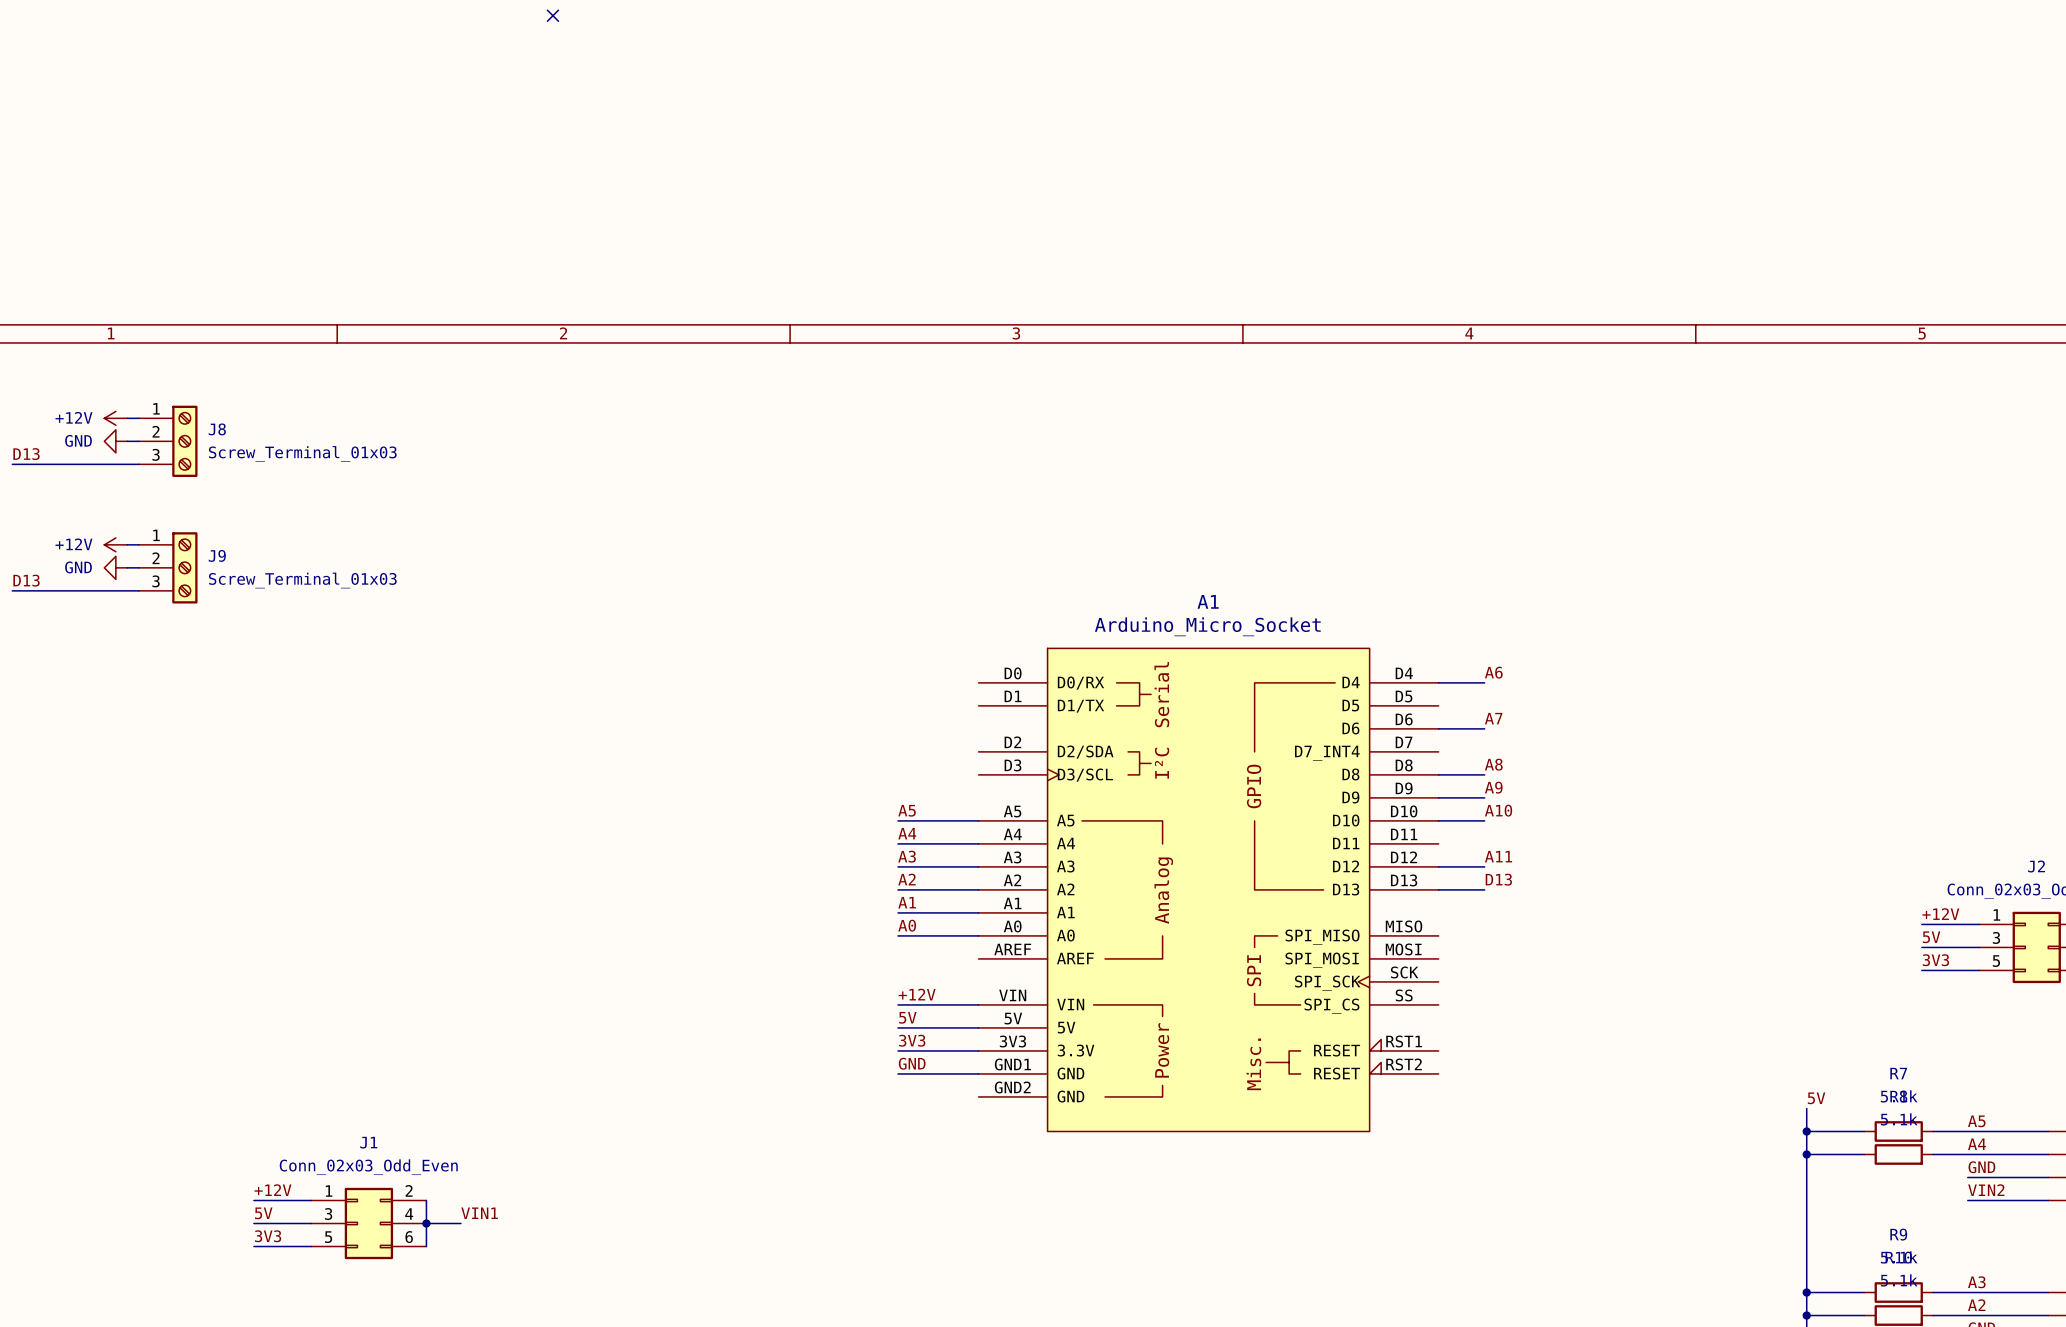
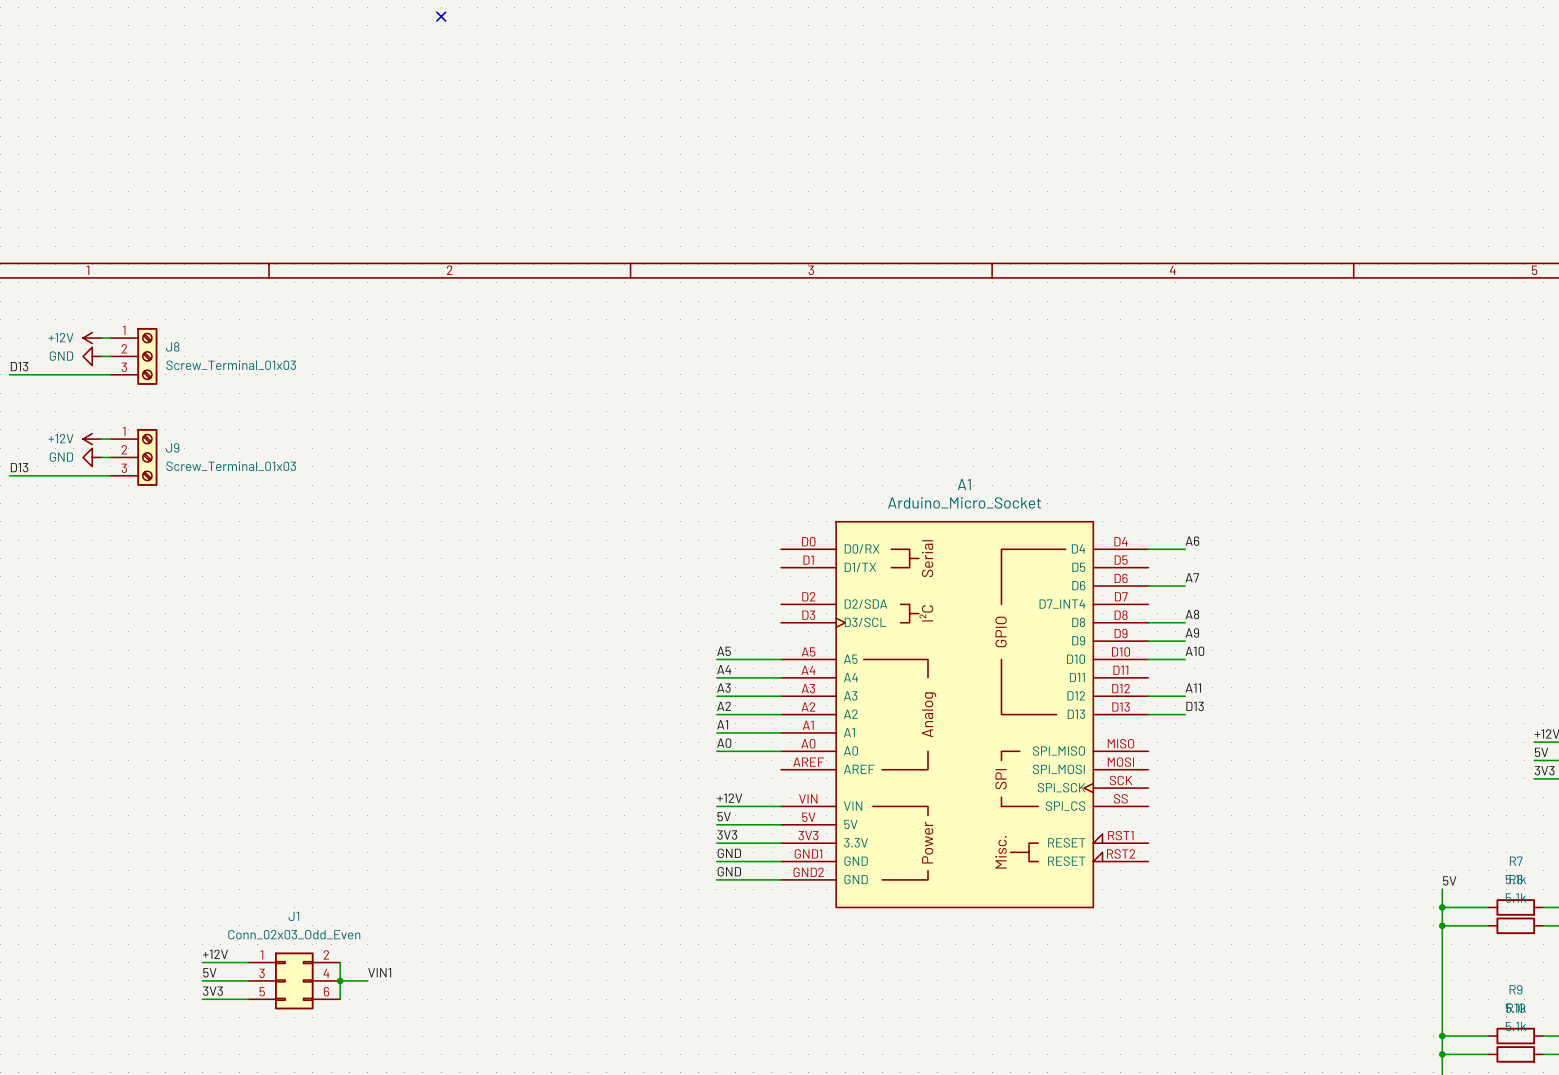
label: none -> GND (729, 871)
wire: none -> (716, 879) (781, 879)

